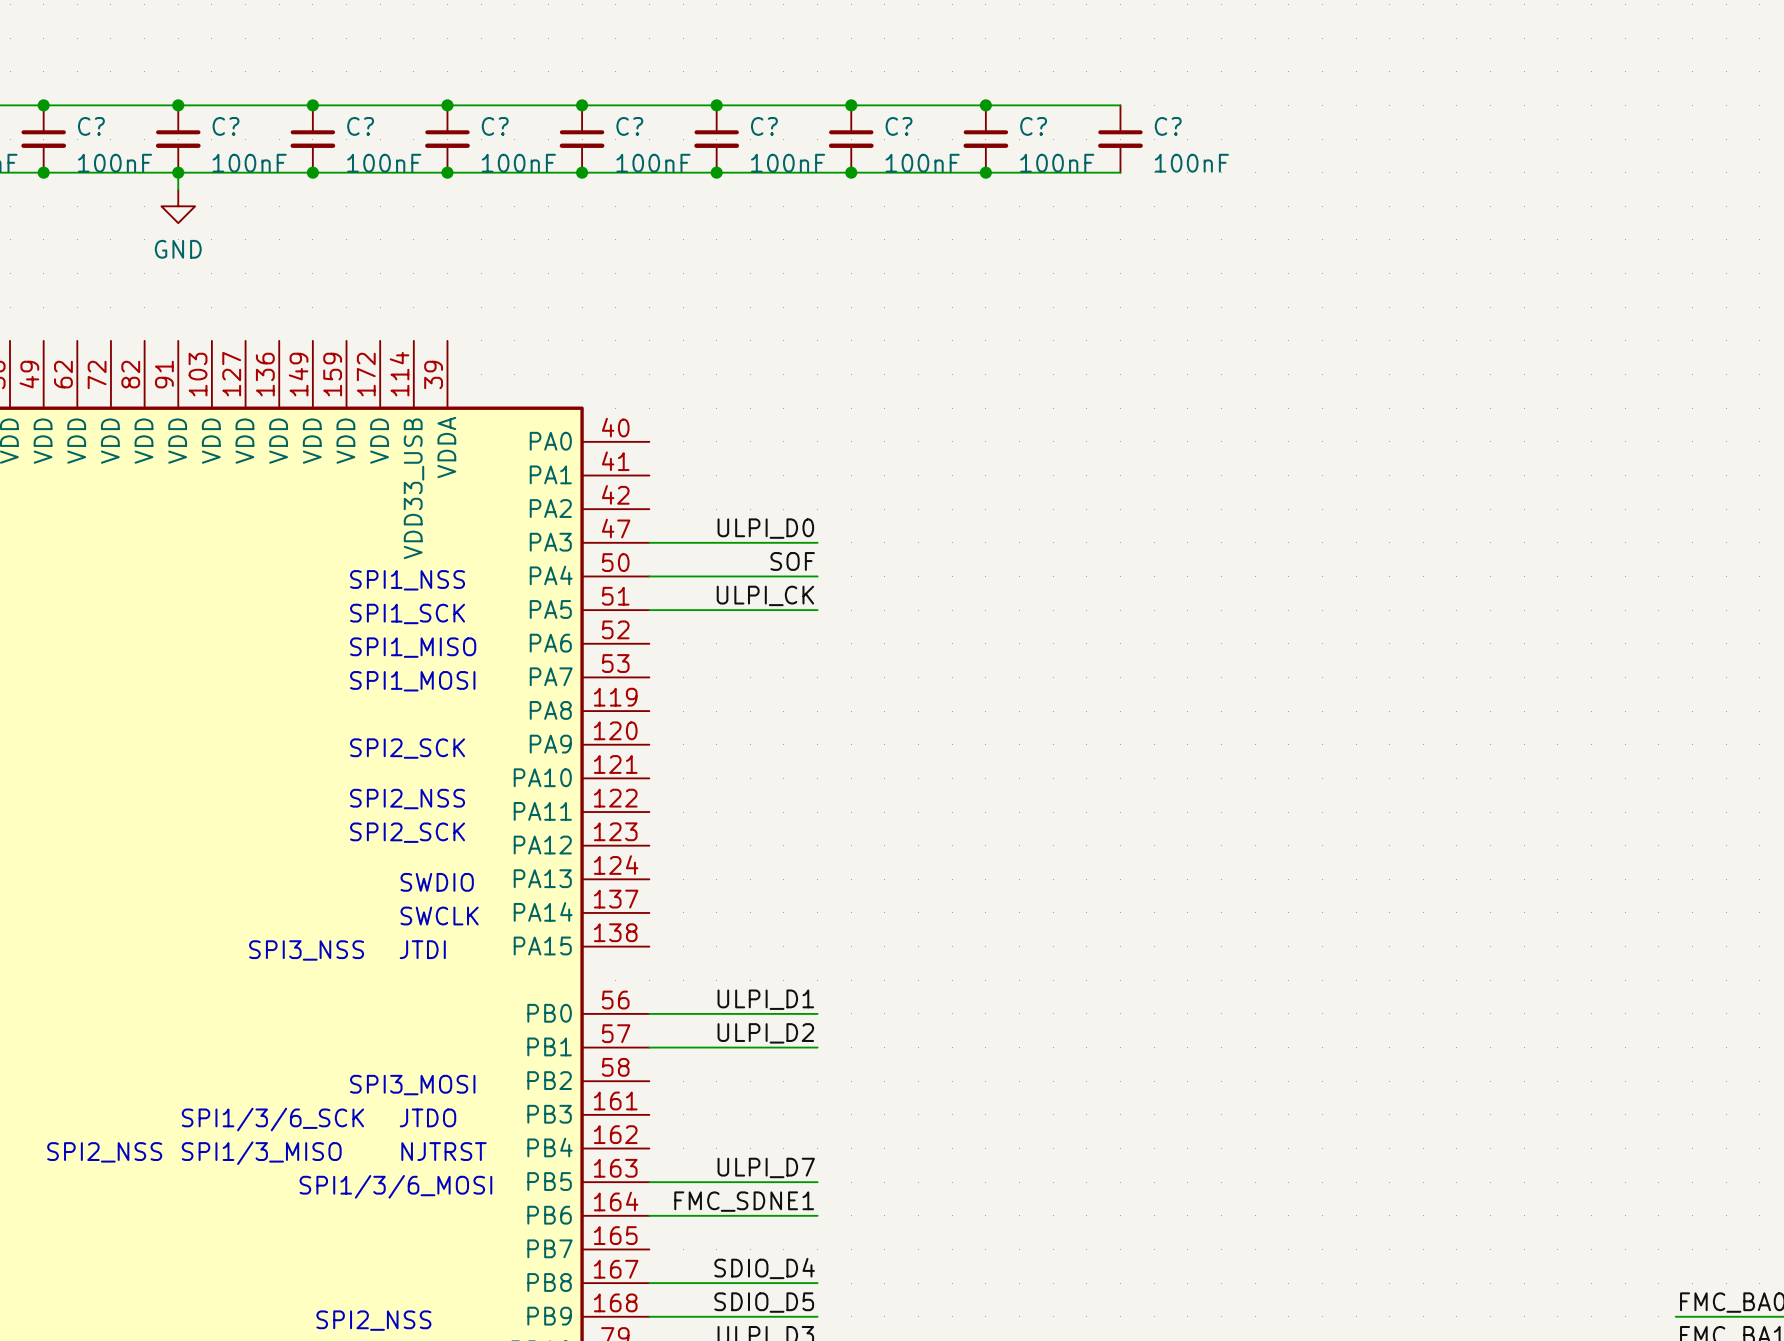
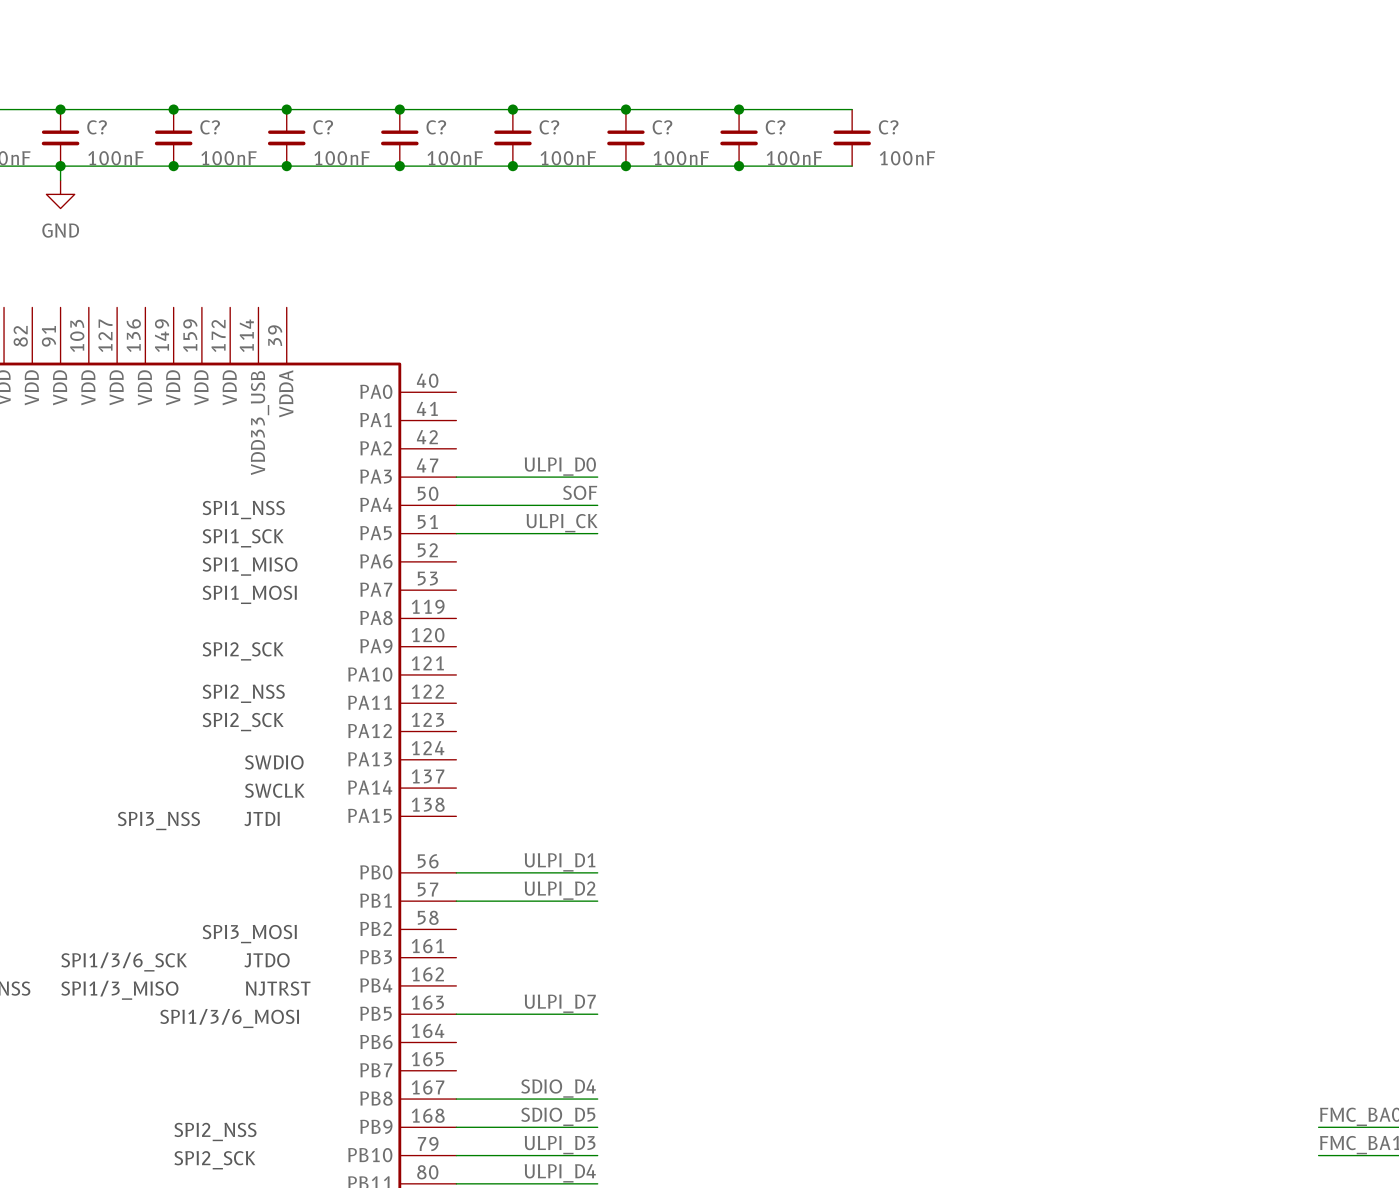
label: FMC_SDNE1 (744, 1201) -> none
wire: (649, 1215) (817, 1215) -> none

